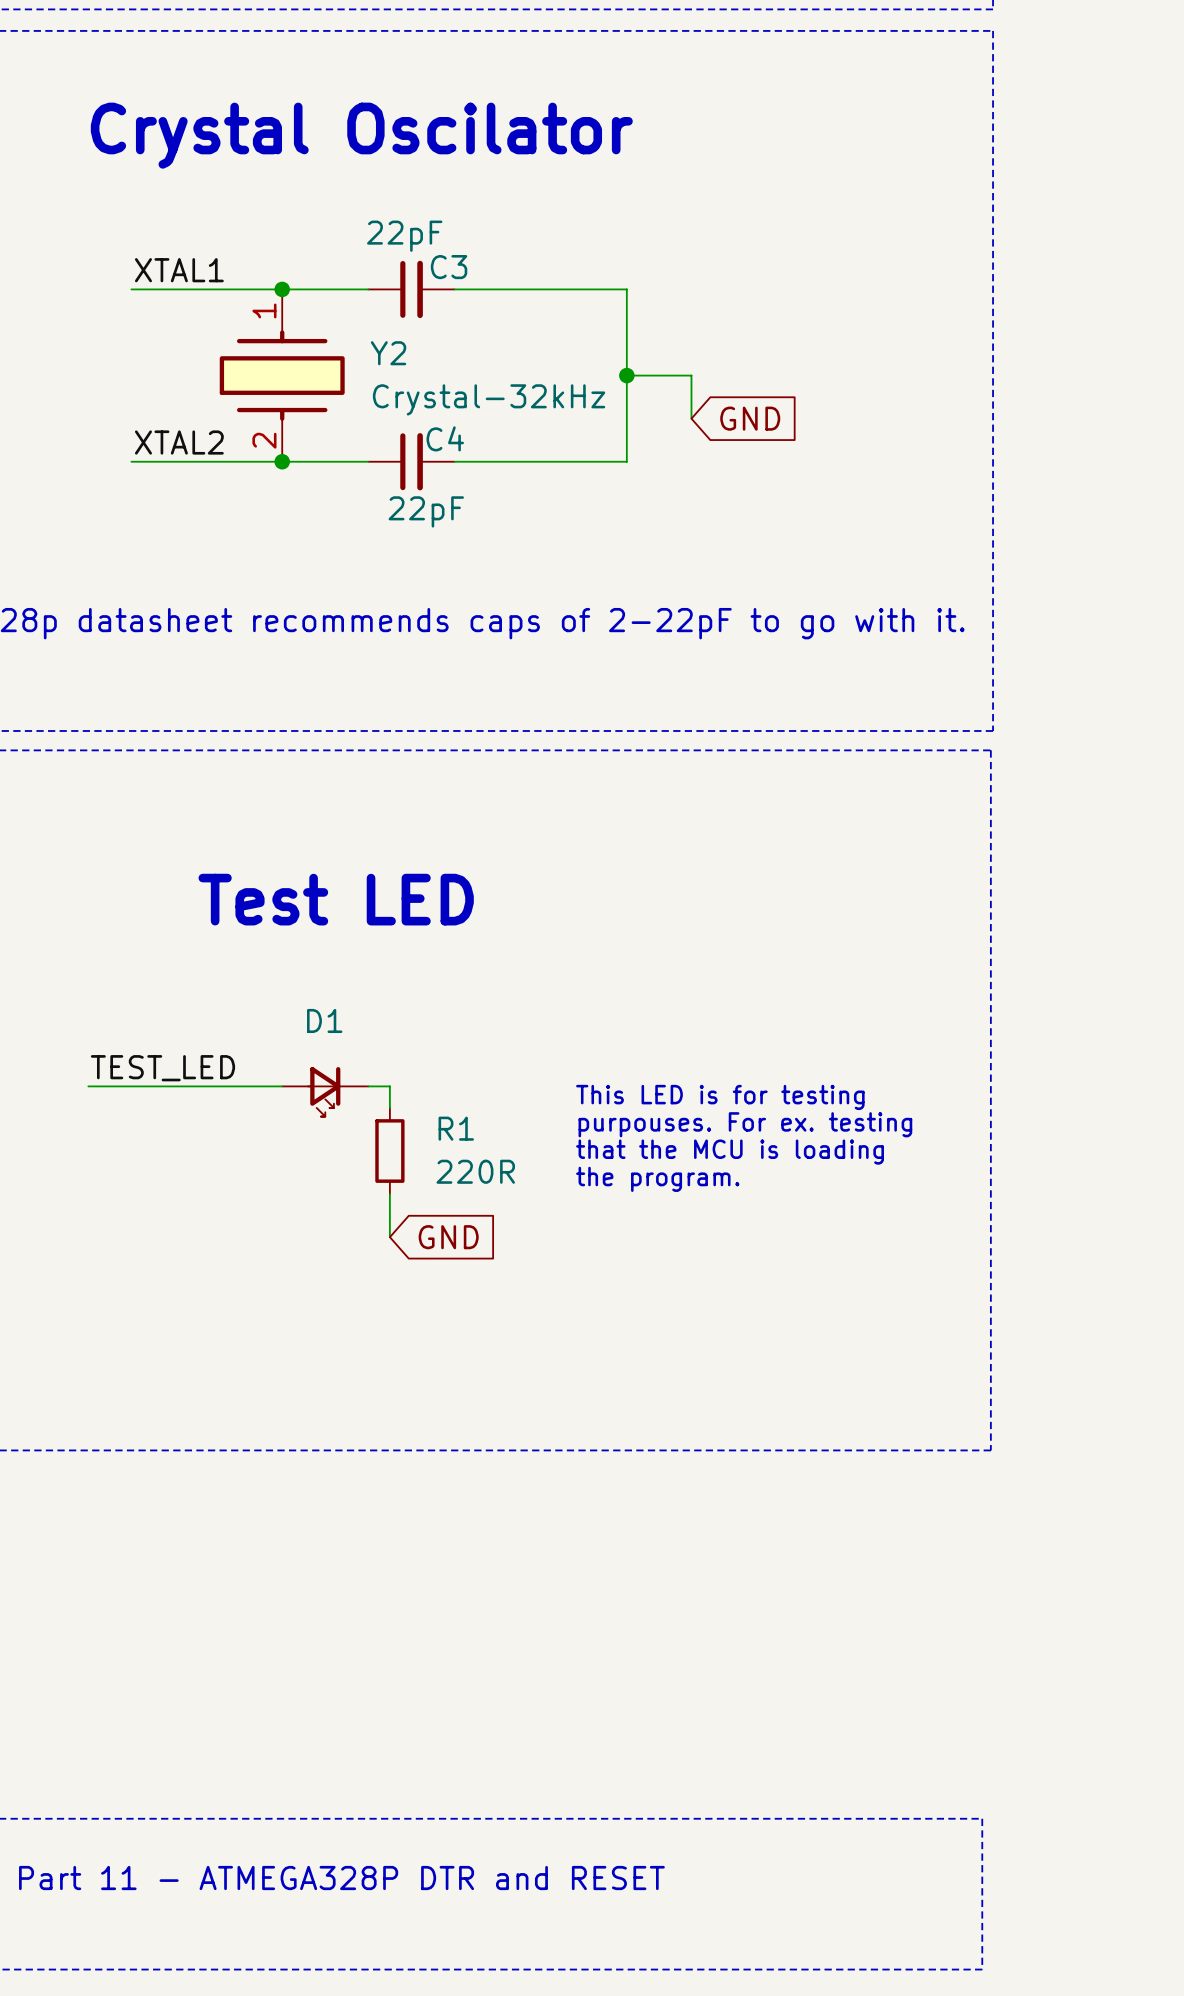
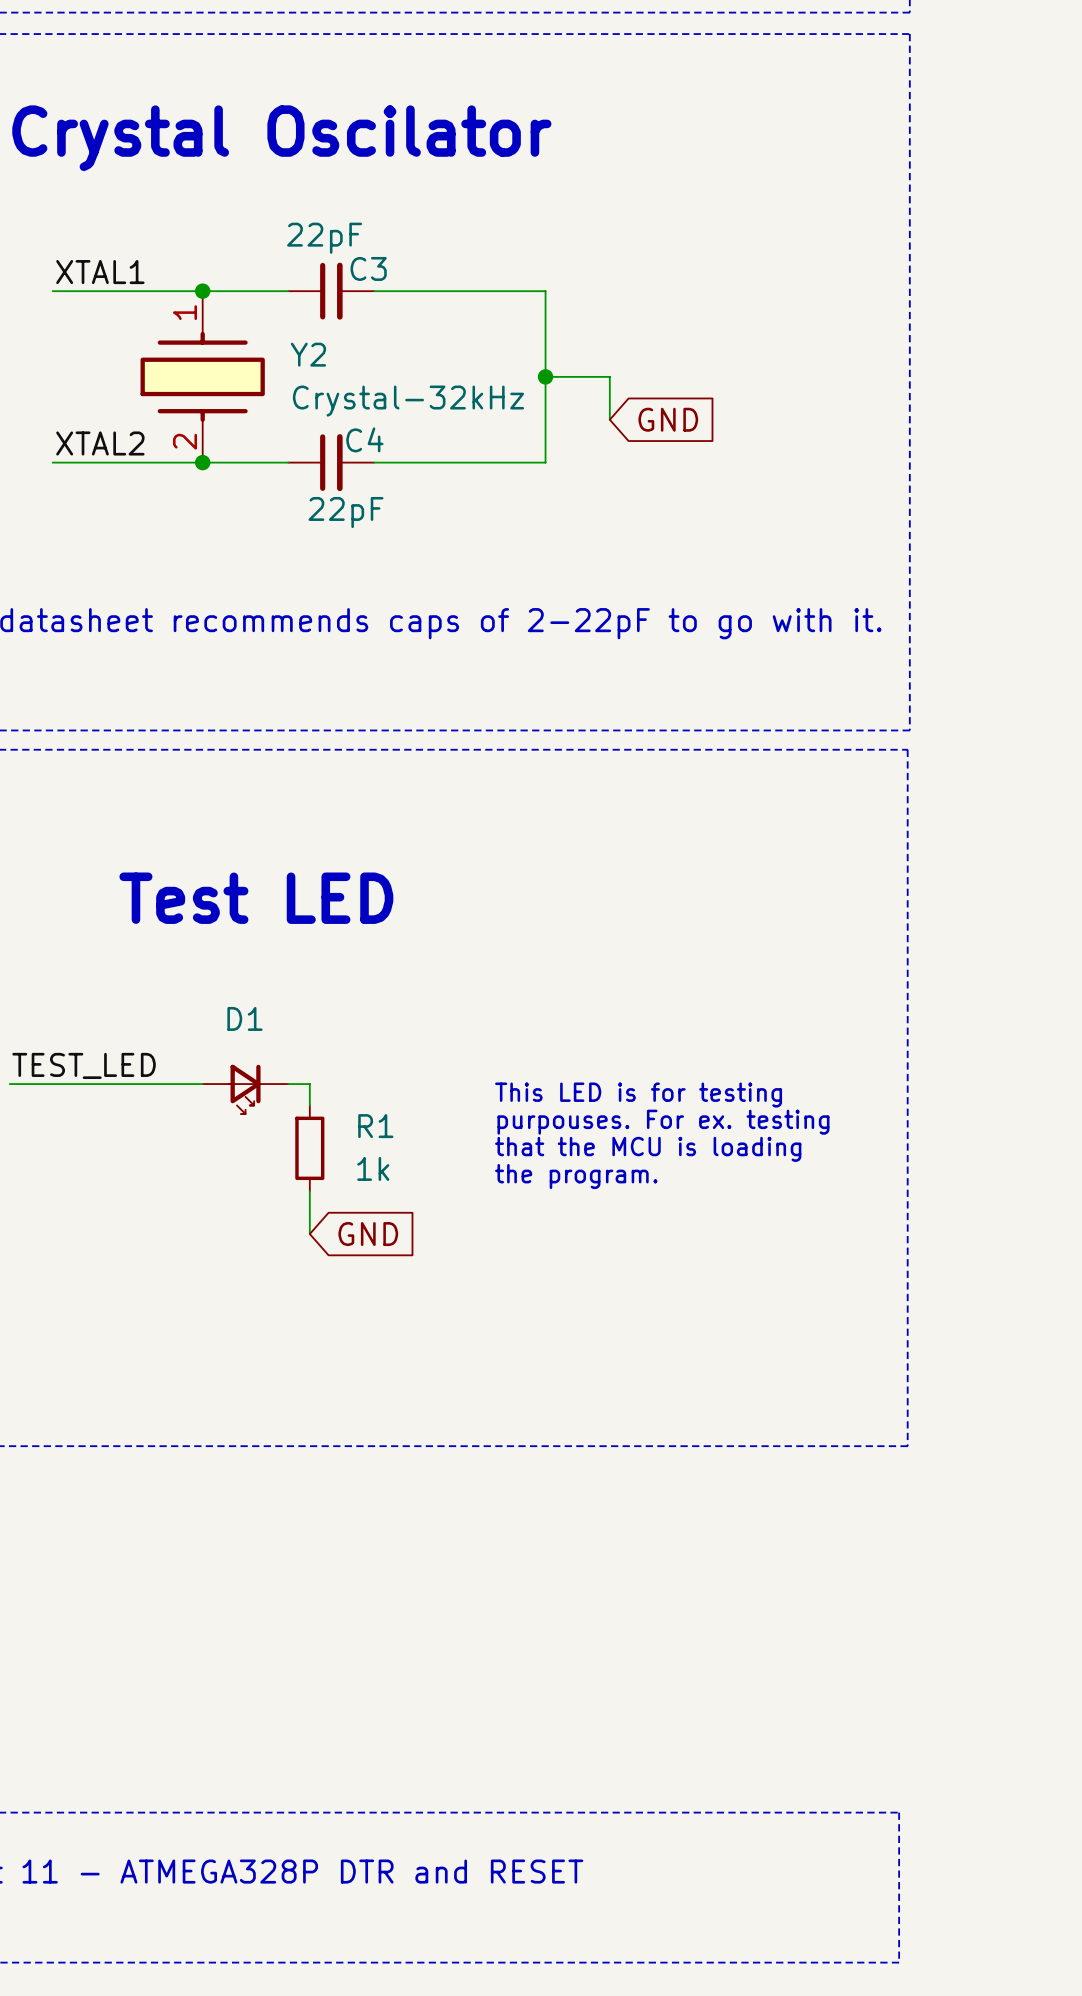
R1 value: 220R (475, 1171) -> 1k (373, 1168)

